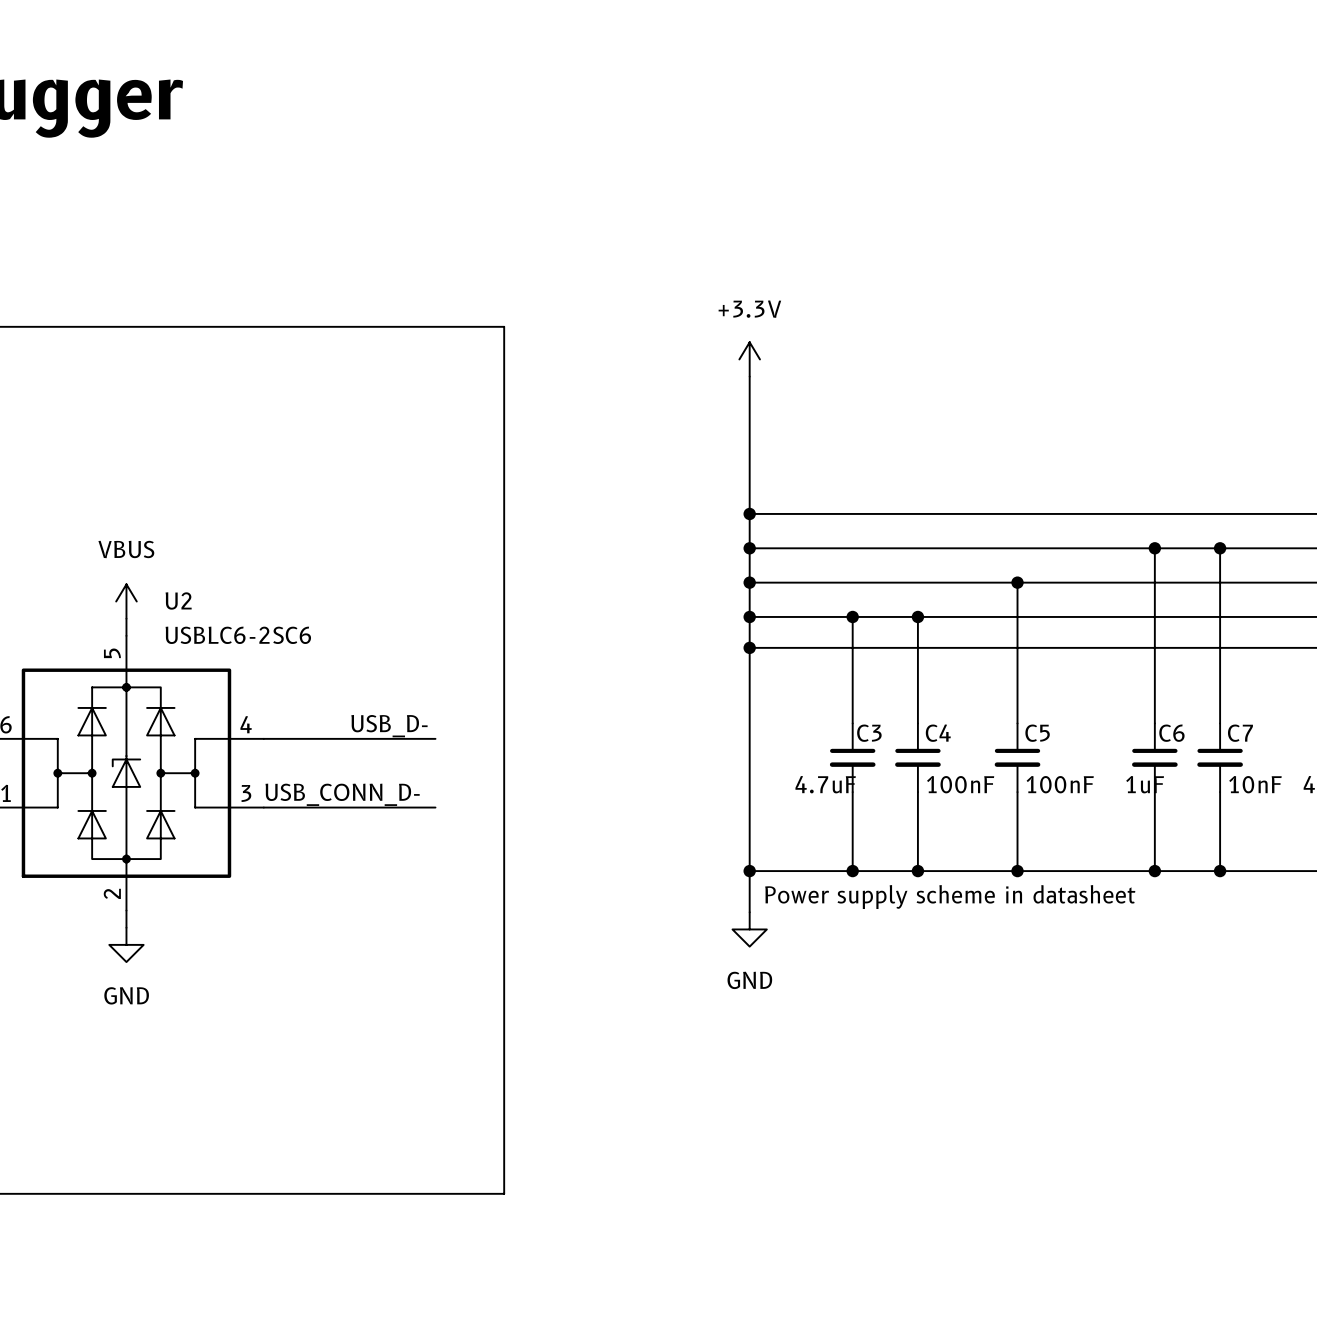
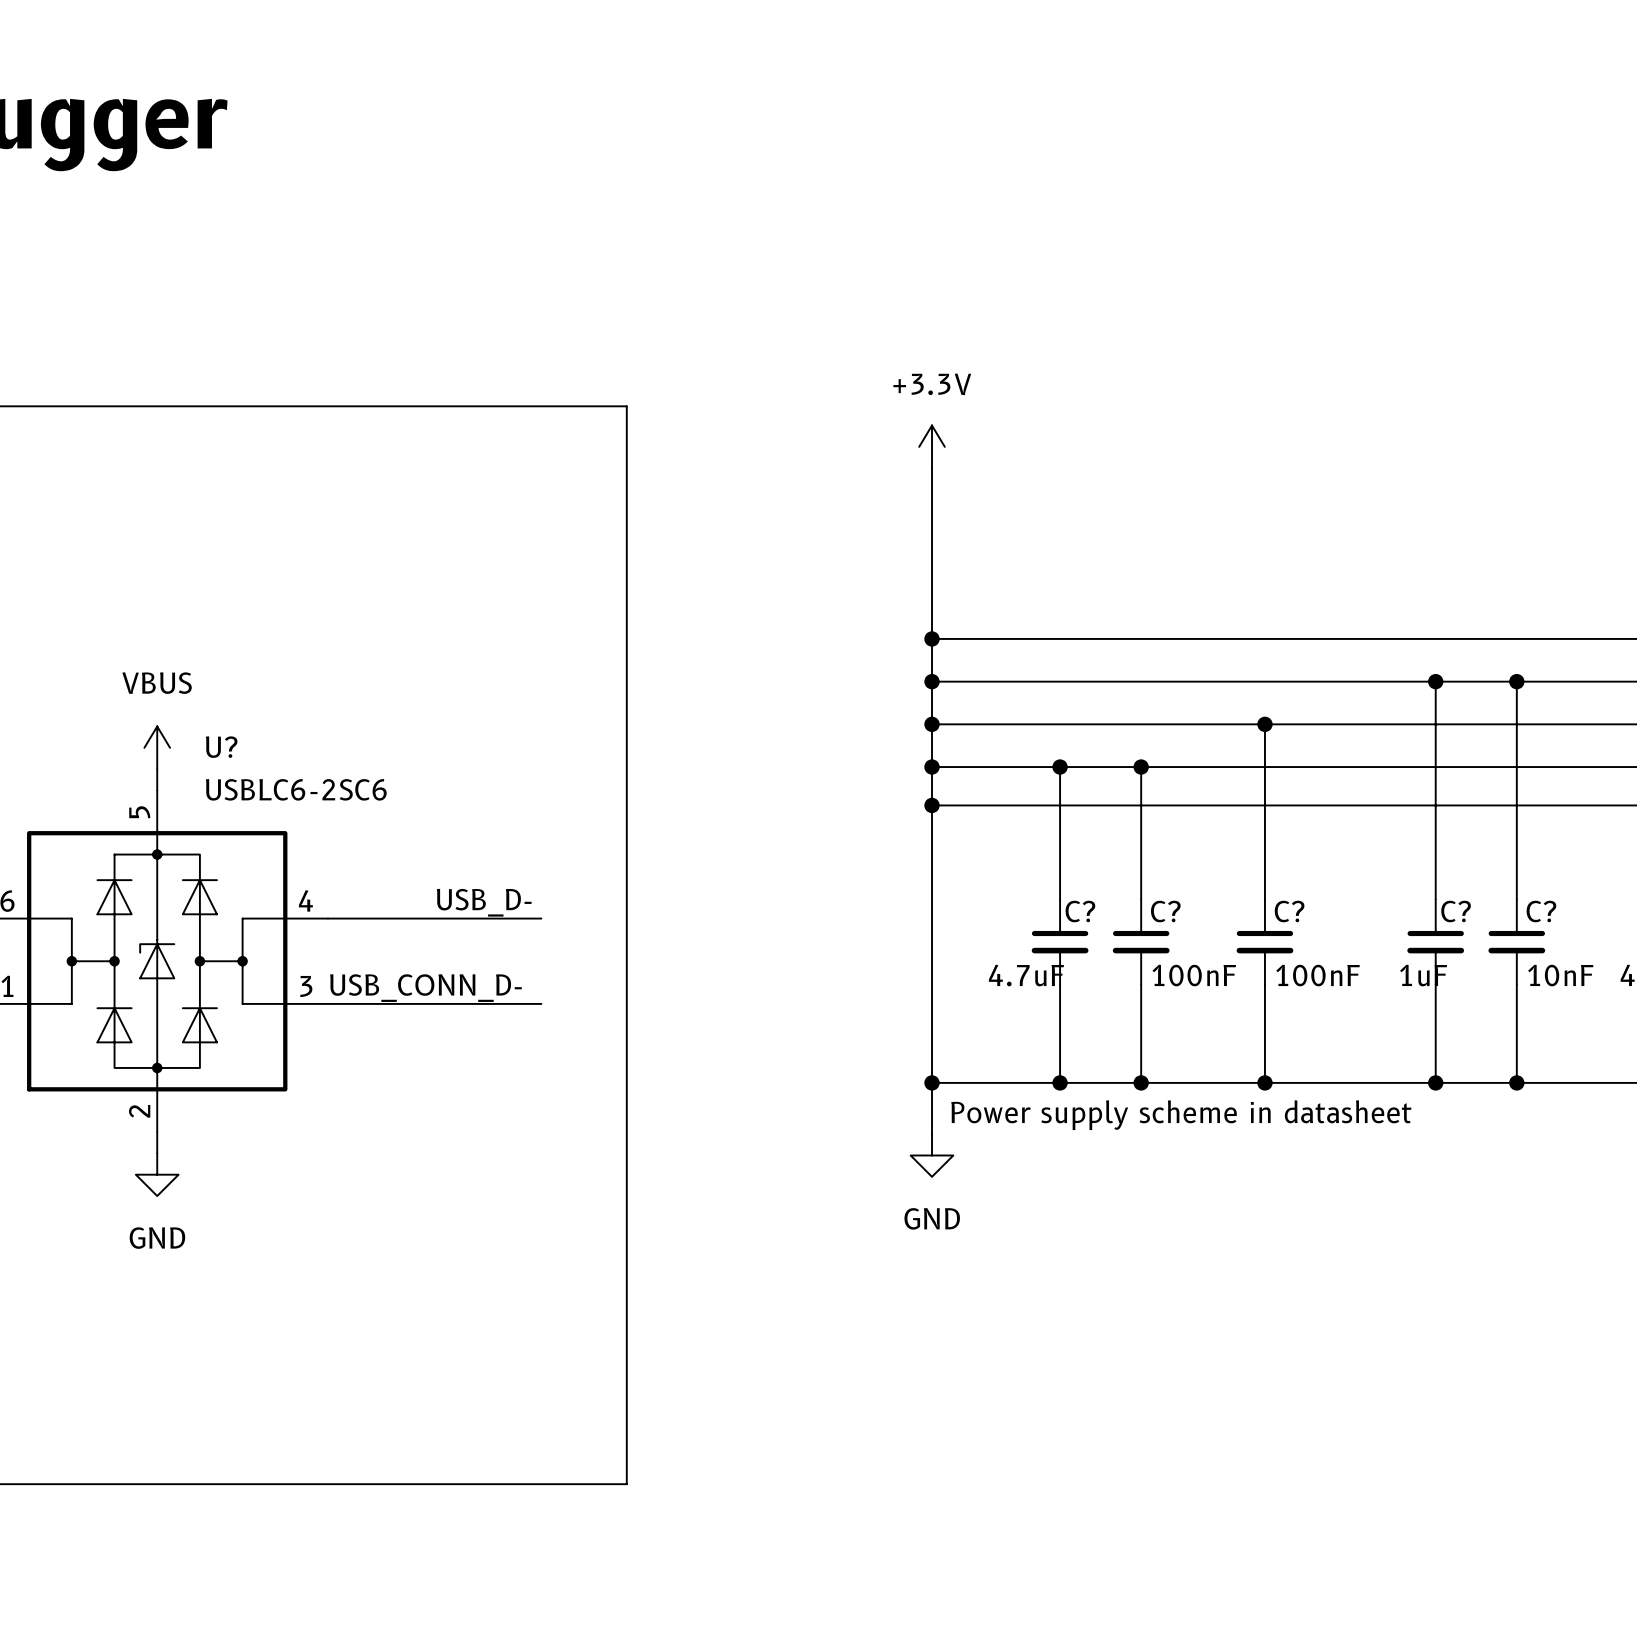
U2 name: U2 (178, 600) -> U? (221, 747)
C3 name: C3 (869, 733) -> C? (1080, 911)
C4 name: C4 (938, 733) -> C? (1165, 911)
C5 name: C5 (1037, 733) -> C? (1289, 911)
C6 name: C6 (1171, 733) -> C? (1456, 911)
C7 name: C7 (1240, 733) -> C? (1541, 911)

